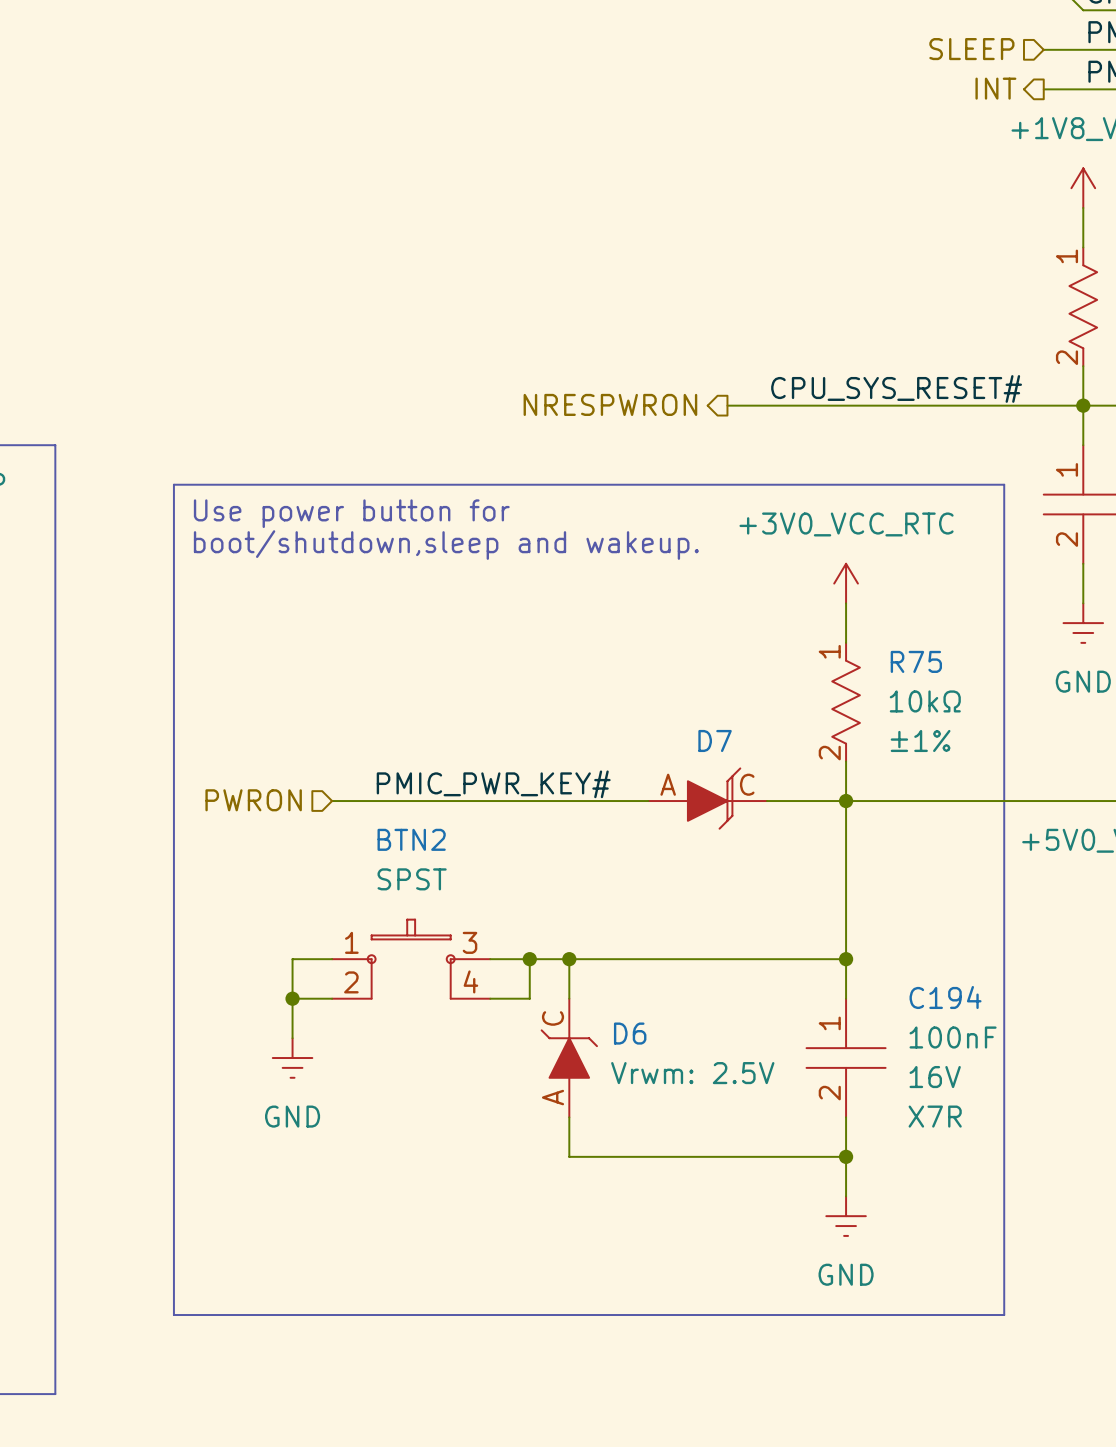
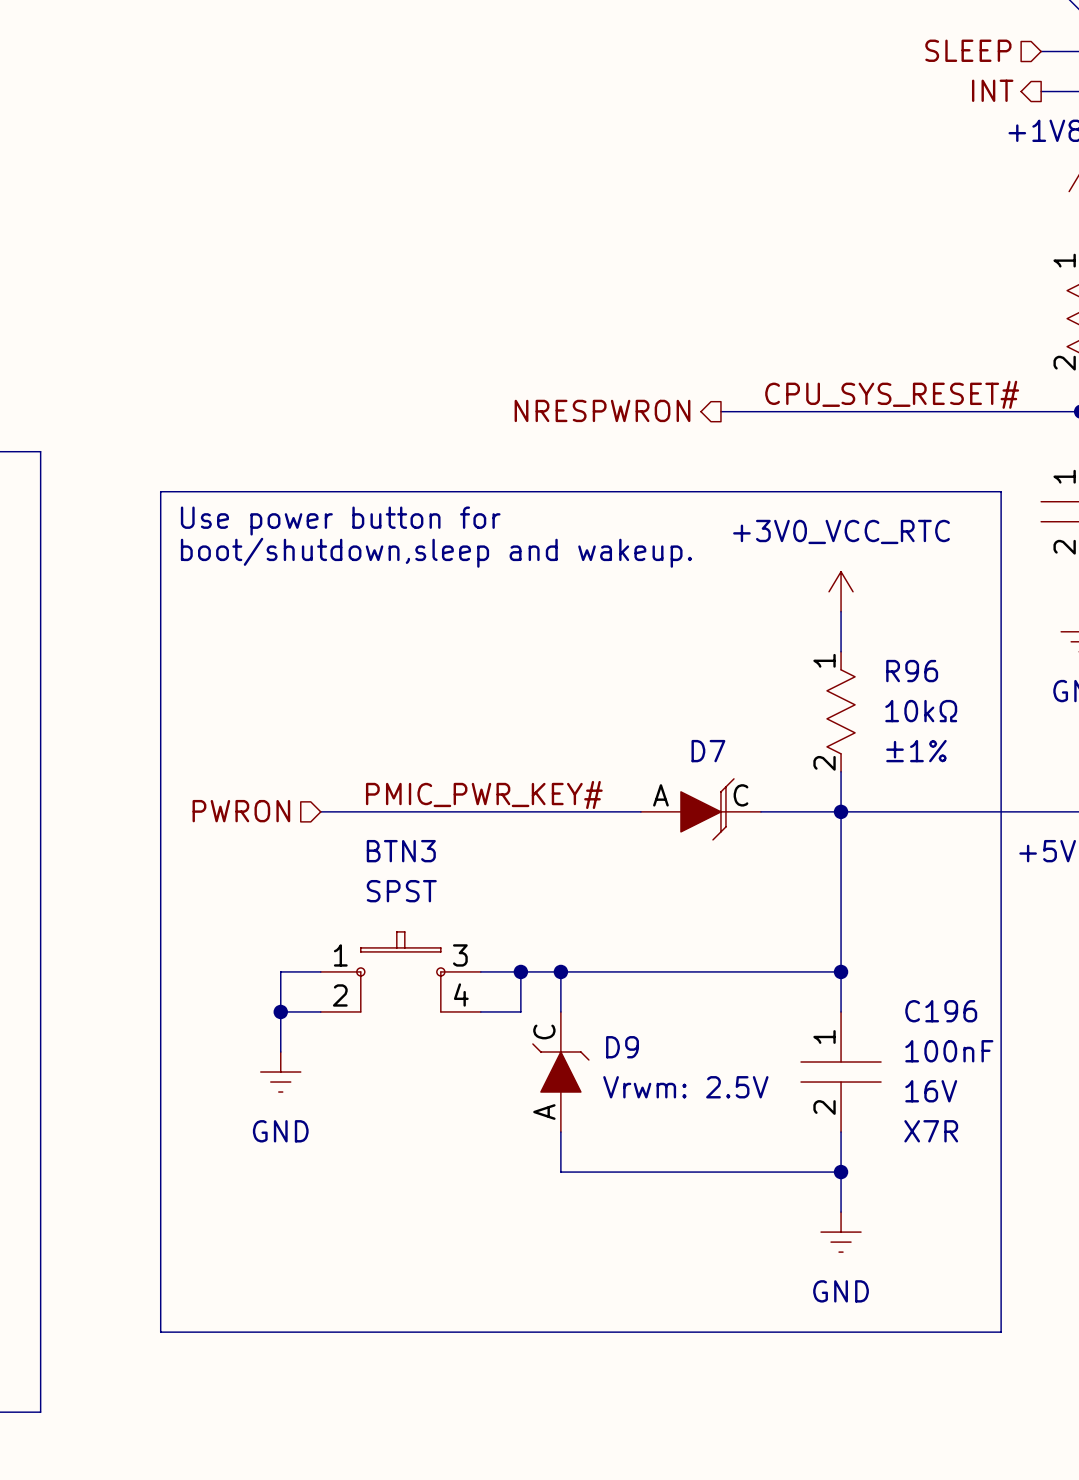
R75 name: R75 (916, 661) -> R96 (912, 671)
BTN2 name: BTN2 (411, 839) -> BTN3 (401, 851)
C194 name: C194 (945, 997) -> C196 (941, 1011)
D6 name: D6 (630, 1033) -> D9 (622, 1047)

